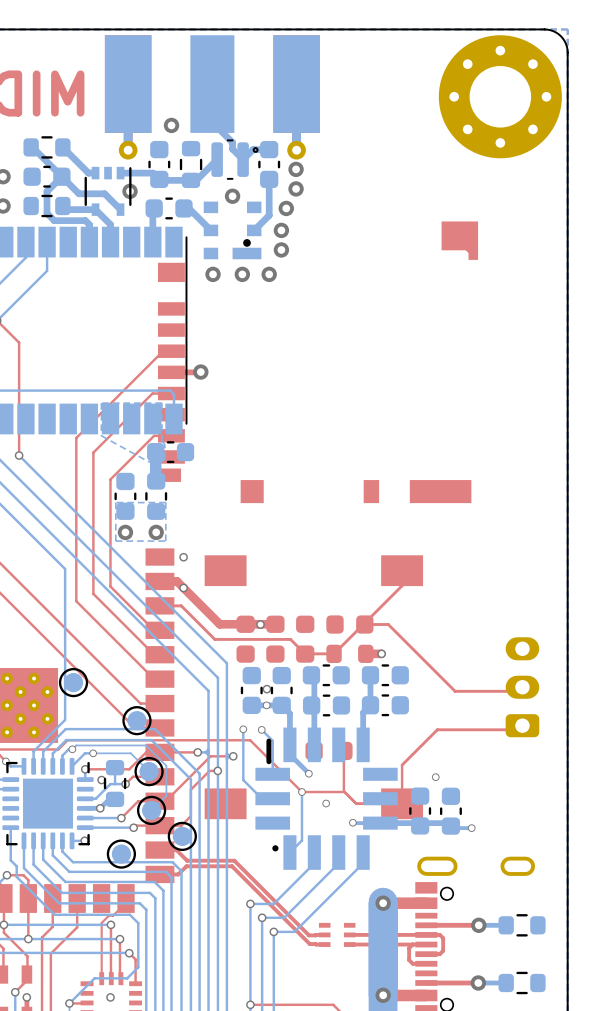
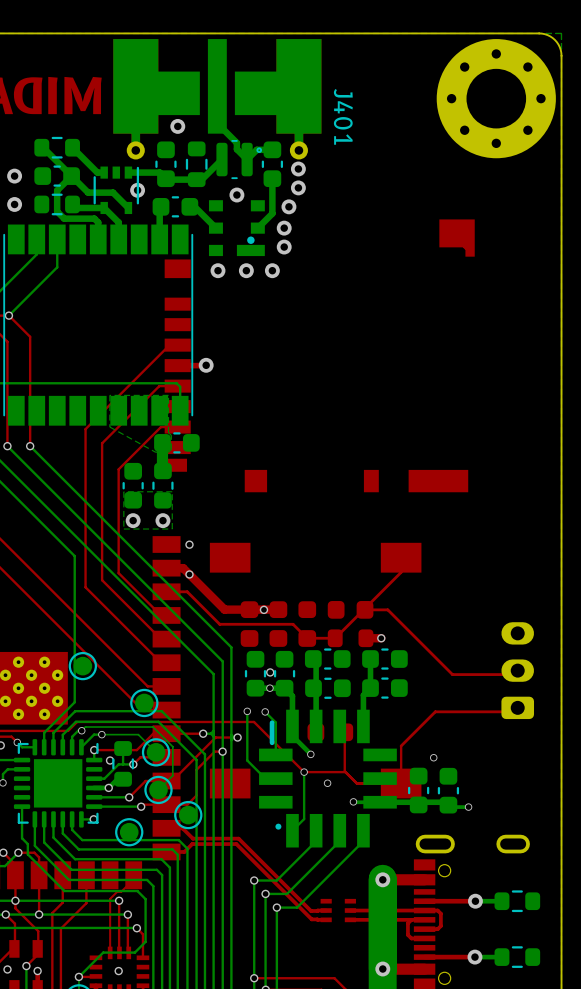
part: (212, 97) -> none
J401: none -> (217, 99)

